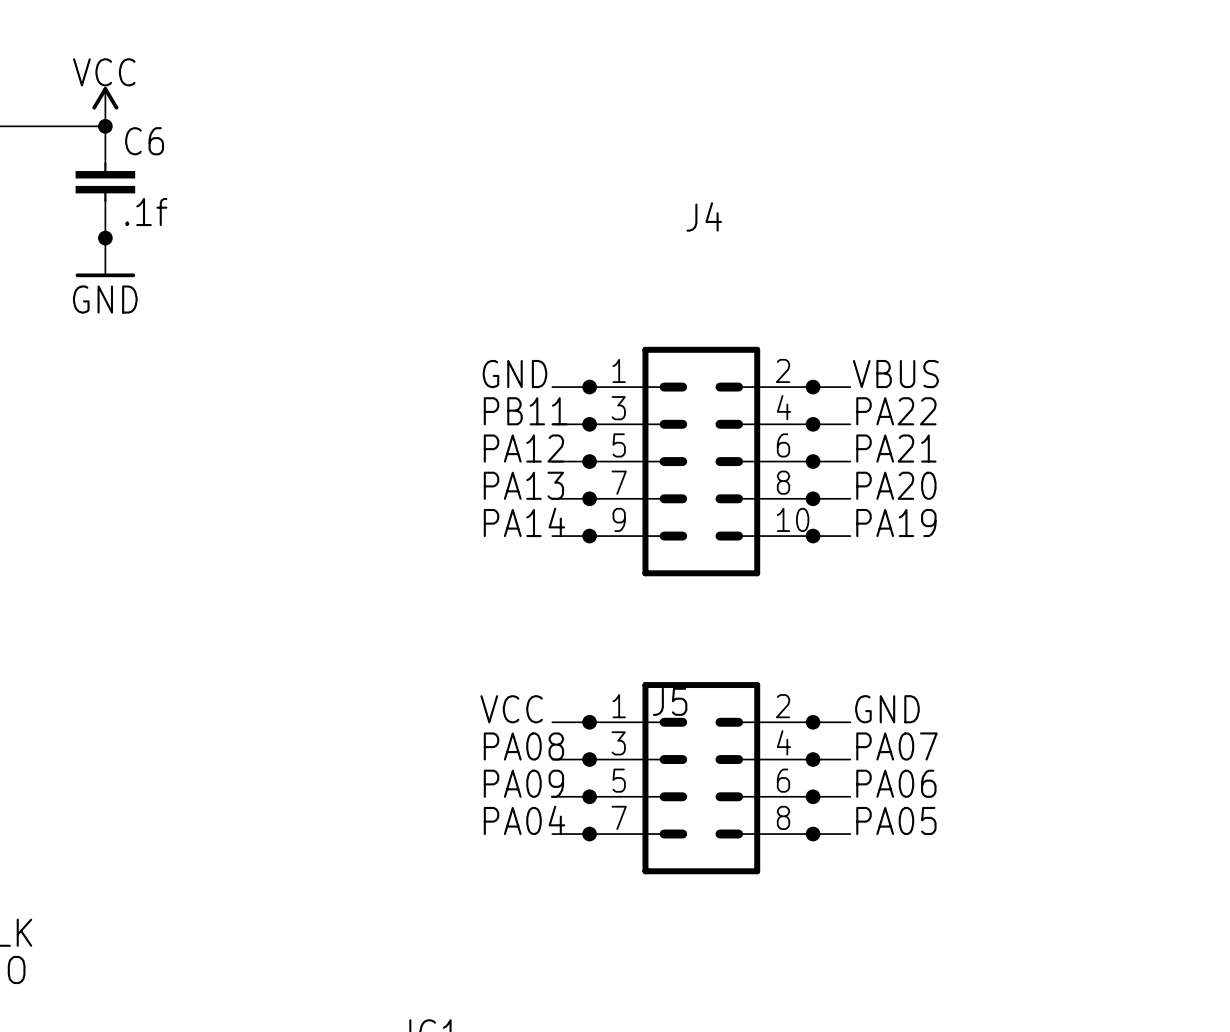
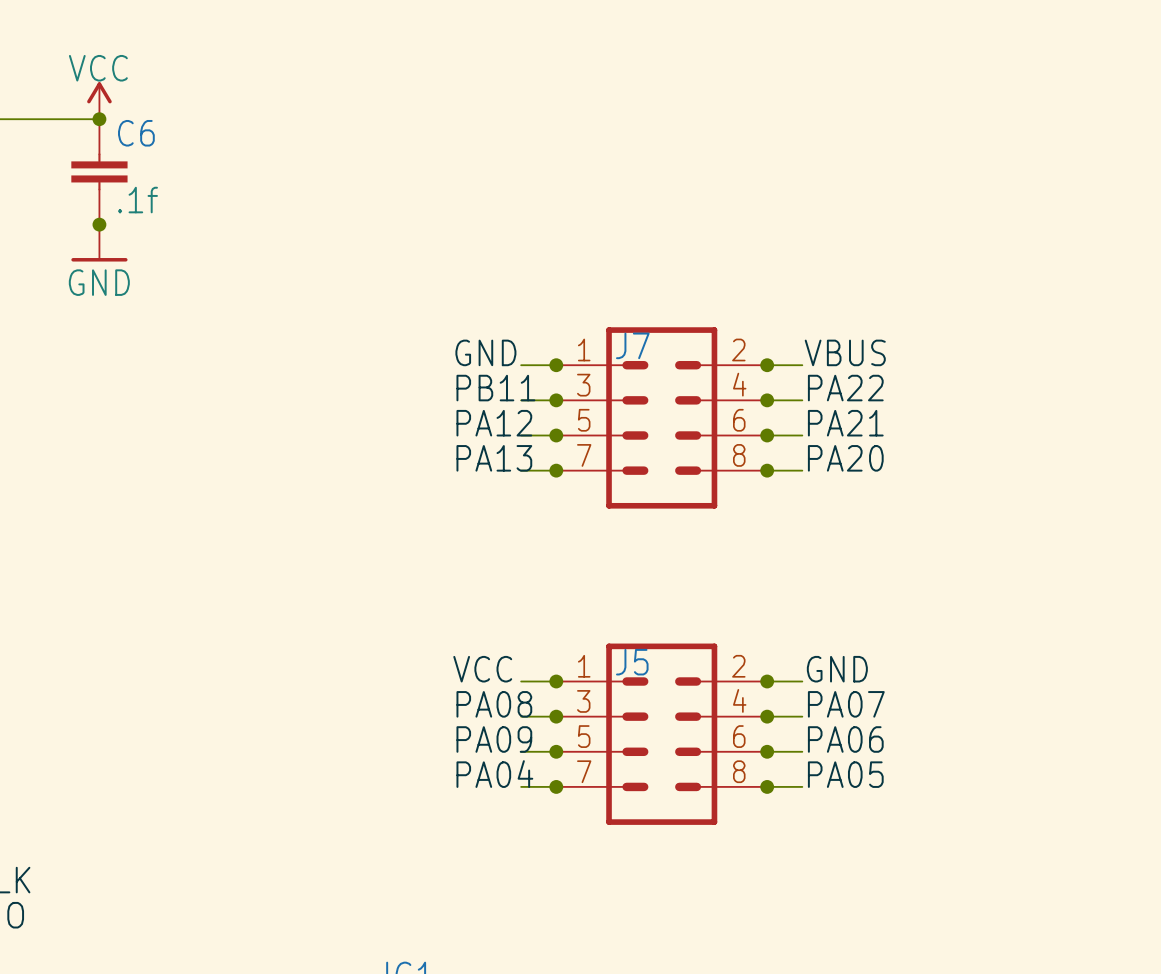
J7: none -> (661, 417)
J4: (701, 461) -> none
label: PA14 (524, 522) -> none
label: PA19 (896, 523) -> none
wire: (552, 536) (589, 536) -> none
junction: (589, 536) -> none
wire: (813, 536) (850, 536) -> none
junction: (813, 536) -> none

